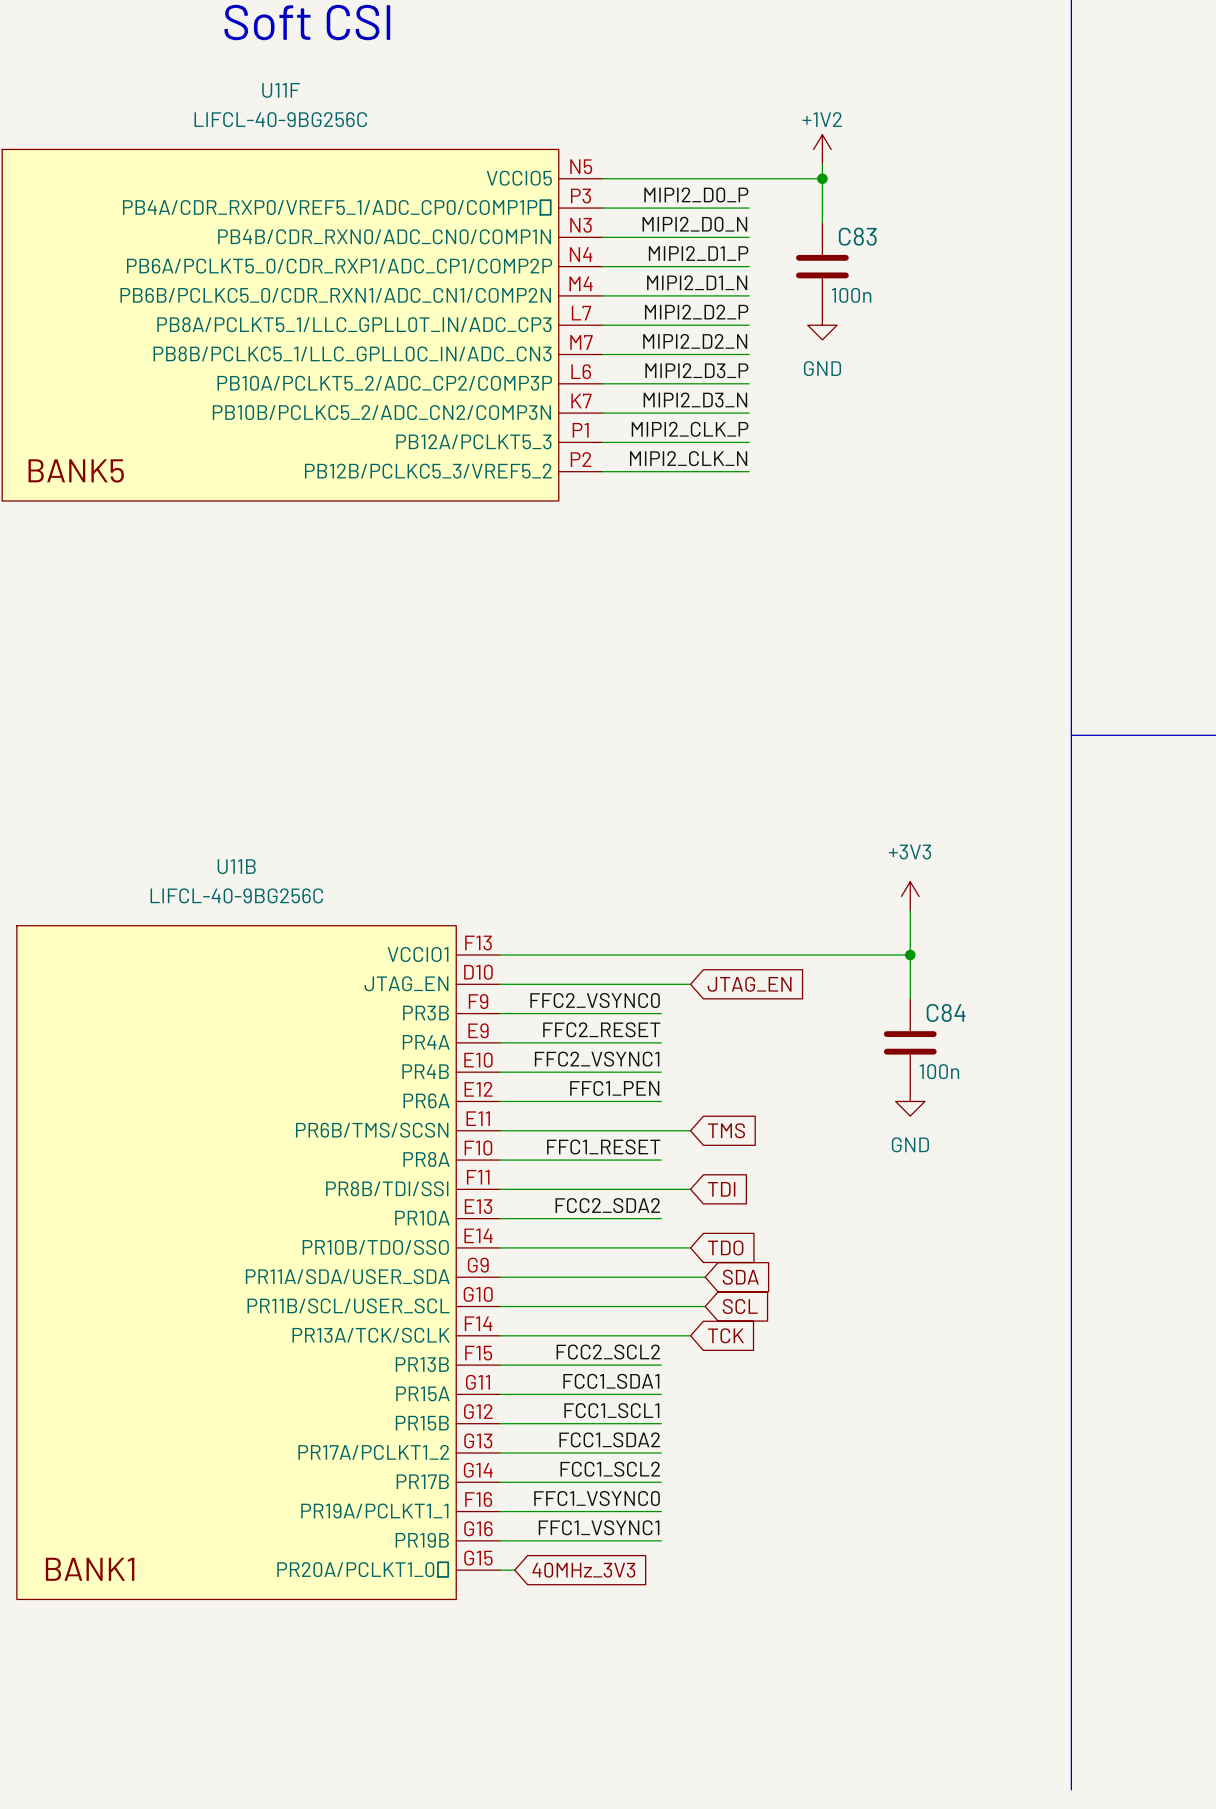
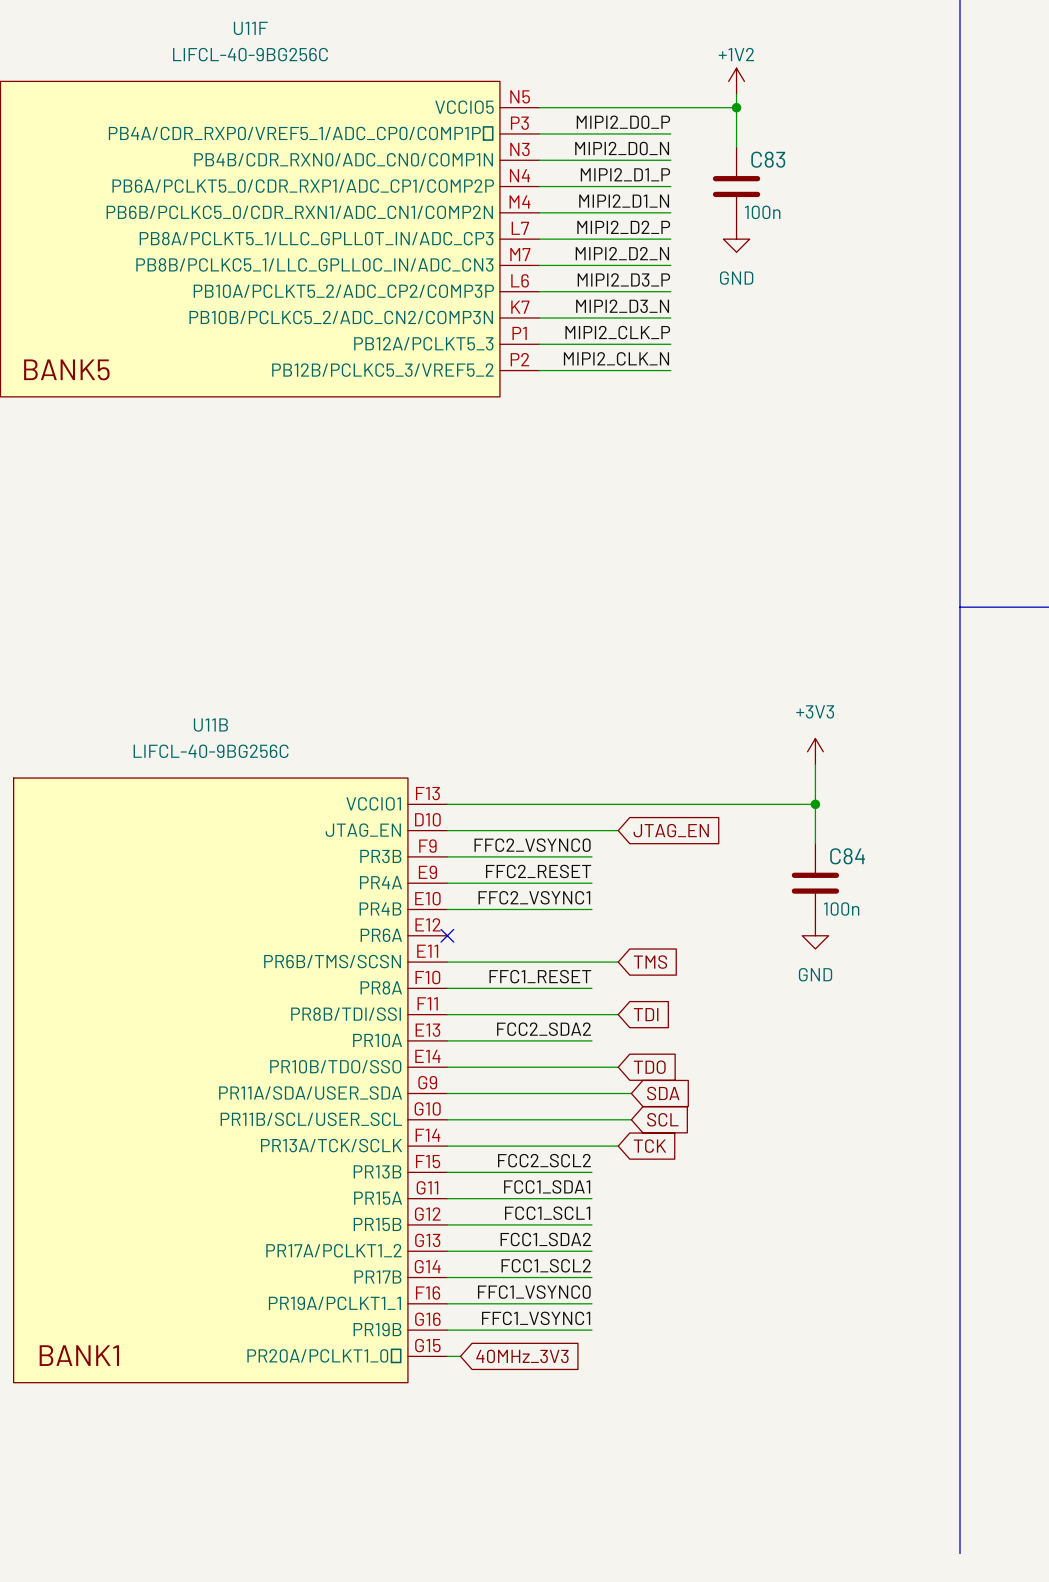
label: FFC1_PEN (614, 1088) -> none
wire: (500, 1101) (661, 1101) -> none
no-connect mark: none -> (447, 935)

